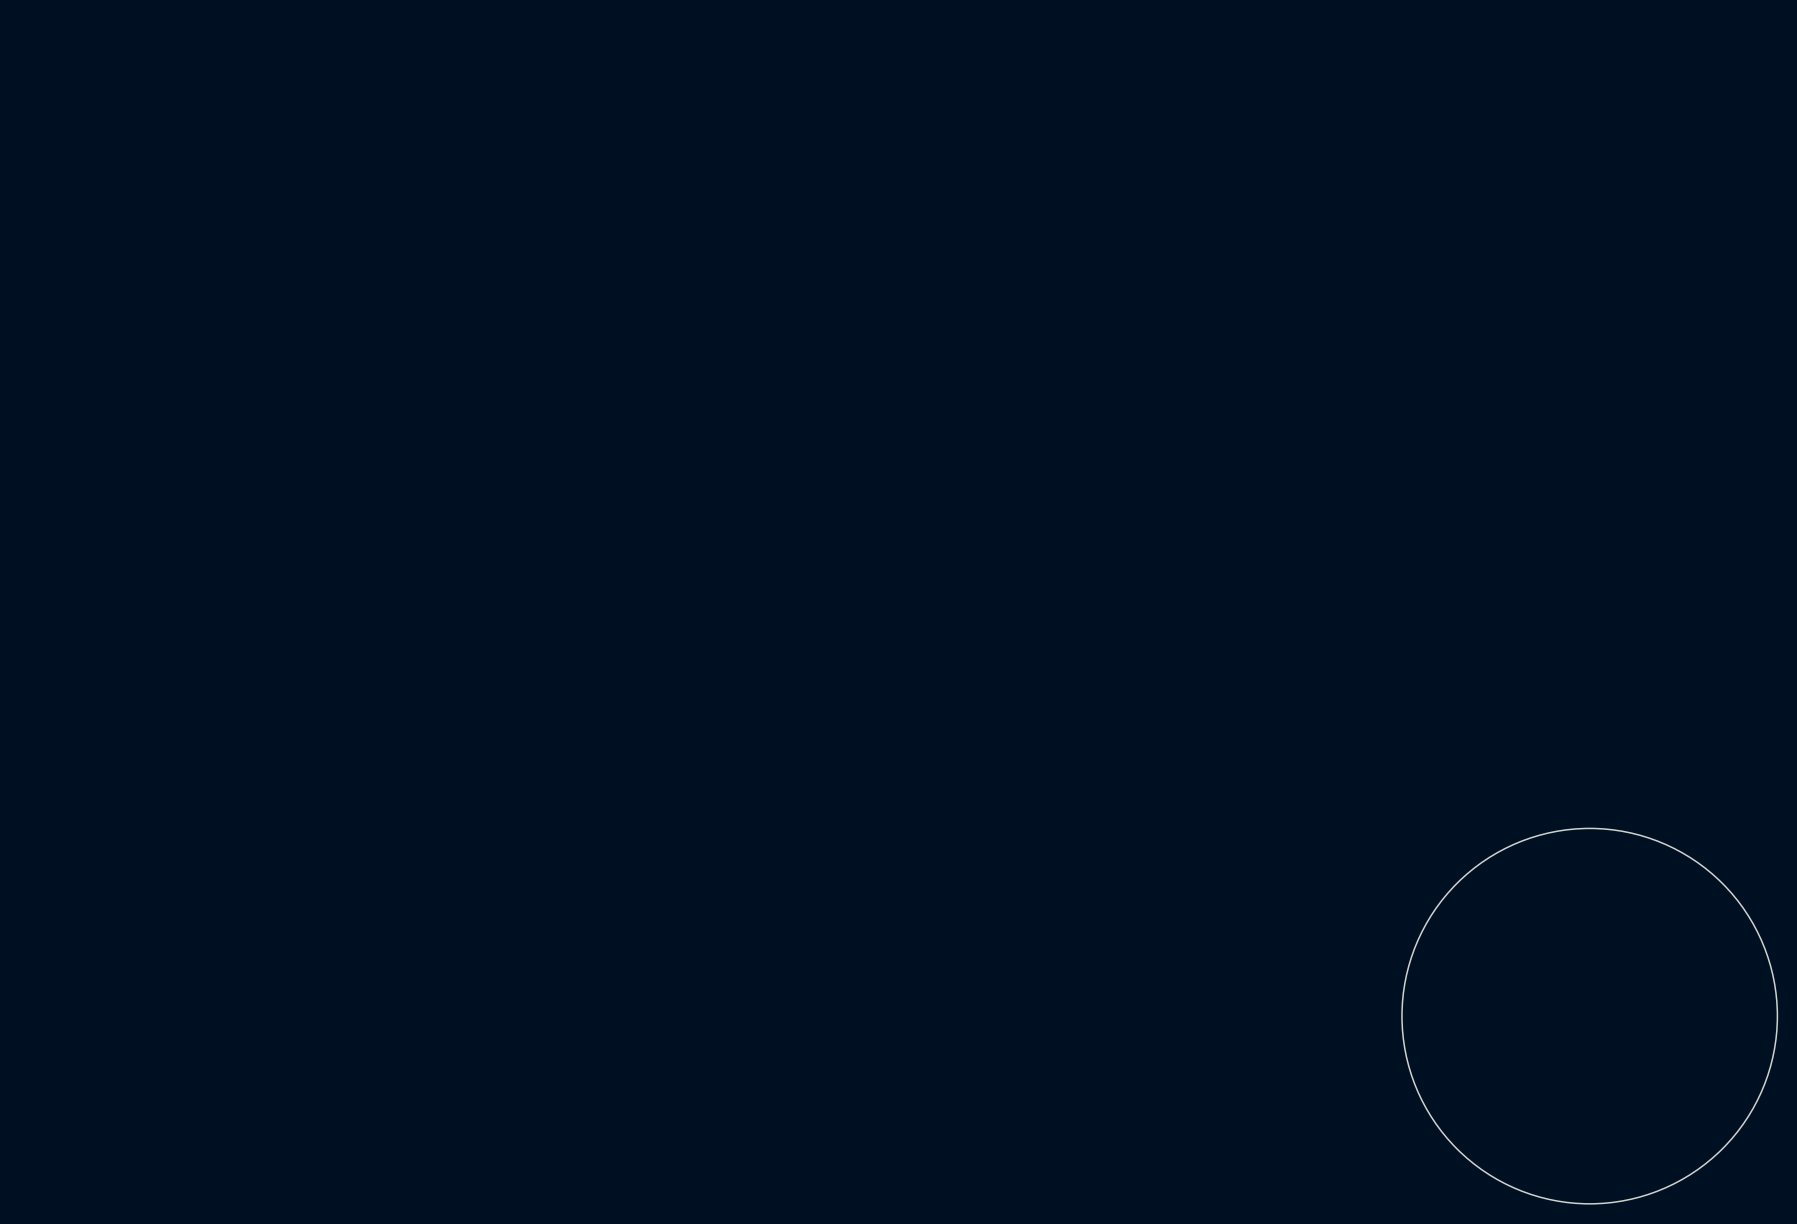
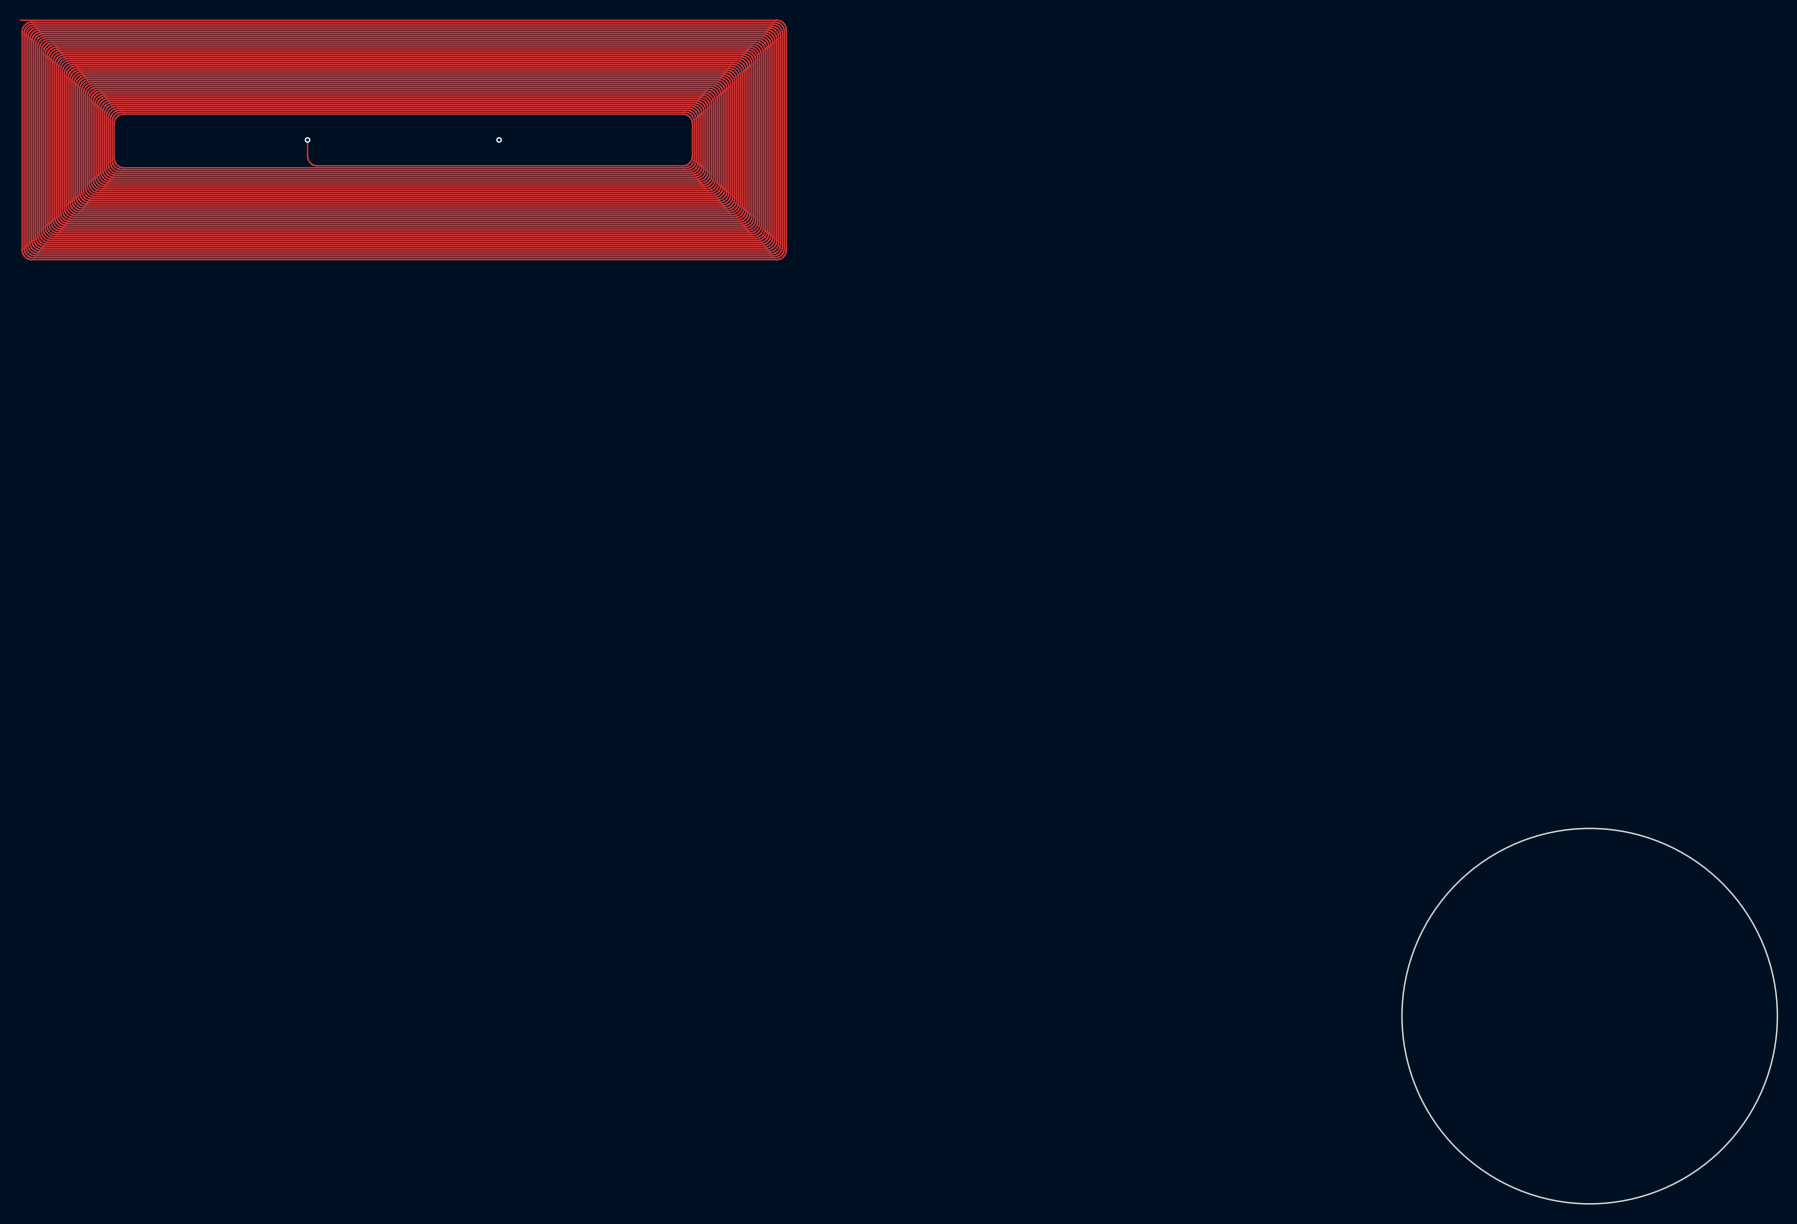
track: none -> (20, 20) (776, 20) (782, 22) (786, 27) (786, 250) (784, 256) (778, 259) (31, 259) (23, 254) (22, 31) (24, 25) (29, 22) (774, 22) (780, 24) (784, 29) (784, 248) (782, 254) (776, 257) (33, 257) (25, 252) (24, 33) (26, 27) (31, 24) (772, 24) (778, 26) (782, 31) (782, 246) (780, 252) (775, 255) (35, 255) (26, 250) (26, 35) (28, 29) (33, 26) (770, 26) (776, 28) (780, 33) (780, 244) (778, 250) (773, 253) (37, 253) (28, 248) (27, 37) (30, 31) (35, 28) (769, 27) (775, 30) (778, 35) (778, 242) (776, 248) (771, 251) (39, 252) (30, 246) (29, 39) (31, 33) (37, 30) (767, 29) (773, 31) (776, 37) (776, 240) (774, 246) (769, 249) (41, 250) (32, 244) (31, 41) (33, 35) (39, 32) (765, 31) (771, 33) (774, 39) (774, 238) (772, 244) (767, 247) (43, 248) (34, 242) (33, 43) (37, 35) (43, 33) (765, 33) (770, 37) (772, 43) (772, 238) (769, 244) (763, 246) (45, 246) (36, 240) (35, 45) (37, 39) (43, 35) (761, 35) (767, 37) (770, 43) (770, 234) (768, 240) (763, 244) (47, 244) (38, 238) (37, 47) (39, 41) (47, 37) (761, 37) (766, 41) (769, 47) (768, 234) (765, 240) (759, 242) (48, 242) (40, 237) (39, 48) (41, 43) (46, 39) (757, 39) (763, 41) (766, 46) (767, 230) (765, 236) (759, 240) (50, 240) (42, 235) (41, 50) (43, 44) (48, 41) (755, 41) (761, 43) (765, 48) (765, 229) (763, 234) (757, 238) (52, 238) (46, 236) (43, 231) (43, 52) (45, 46) (52, 43) (755, 43) (761, 46) (763, 52) (763, 229) (759, 234) (753, 236) (54, 236) (48, 234) (45, 229) (45, 54) (47, 48) (54, 45) (753, 45) (759, 48) (761, 54) (761, 227) (757, 232) (751, 234) (56, 234) (50, 232) (47, 227) (47, 56) (49, 50) (56, 47) (752, 47) (757, 50) (759, 56) (759, 225) (755, 230) (749, 232) (58, 232) (52, 230) (49, 225) (48, 58) (51, 52) (58, 48) (750, 49) (755, 52) (757, 58) (757, 223) (753, 228) (748, 230) (60, 230) (54, 228) (51, 223) (50, 60) (53, 54) (60, 50) (748, 51) (753, 54) (755, 60) (755, 221) (752, 226) (746, 229) (62, 229) (56, 226) (53, 221) (52, 62) (54, 56) (60, 53) (744, 52) (750, 54) (753, 60) (753, 217) (751, 223) (746, 226) (64, 227) (58, 225) (54, 219) (54, 64) (56, 58) (64, 54) (744, 54) (749, 58) (751, 64) (751, 217) (748, 223) (742, 225) (66, 225) (60, 223) (56, 217) (56, 66) (58, 60) (66, 56) (742, 56) (747, 60) (749, 66) (749, 215) (746, 221) (740, 223) (68, 223) (62, 221) (58, 215) (58, 68) (60, 62) (66, 58) (738, 58) (744, 60) (747, 66) (748, 211) (745, 217) (740, 221) (70, 221) (64, 219) (60, 213) (60, 70) (62, 64) (70, 60) (738, 60) (744, 64) (746, 70) (745, 211) (742, 217) (736, 219) (71, 219) (66, 217) (62, 211) (62, 71) (64, 66) (71, 62) (736, 62) (742, 66) (744, 71) (743, 210) (740, 215) (734, 217) (73, 217) (67, 215) (64, 210) (64, 73) (66, 67) (71, 64) (732, 64) (738, 66) (742, 71) (742, 206) (740, 212) (734, 215) (75, 215) (69, 213) (66, 208) (66, 75) (68, 69) (75, 66) (732, 66) (738, 69) (740, 75) (740, 206) (736, 211) (730, 213) (77, 213) (71, 211) (68, 206) (68, 77) (70, 71) (77, 68) (730, 68) (736, 71) (738, 77) (738, 204) (734, 209) (728, 211) (79, 211) (73, 209) (70, 204) (70, 79) (72, 73) (79, 70) (729, 70) (734, 73) (736, 79) (736, 202) (732, 207) (726, 209) (81, 209) (75, 207) (72, 202) (71, 81) (74, 75) (81, 71) (727, 72) (732, 75) (734, 81) (734, 200) (731, 205) (725, 207) (83, 207) (77, 205) (74, 200) (73, 83) (75, 77) (83, 73) (725, 74) (730, 77) (732, 83) (732, 198) (729, 203) (723, 206) (85, 206) (79, 203) (76, 198) (75, 85) (77, 79) (83, 76) (721, 75) (727, 77) (730, 83) (730, 194) (728, 200) (723, 203) (87, 204) (81, 202) (77, 196) (77, 87) (79, 81) (87, 77) (721, 77) (726, 81) (728, 87) (728, 194) (725, 200) (719, 202) (89, 202) (83, 200) (79, 194) (79, 89) (81, 83) (87, 79) (717, 79) (723, 81) (726, 87) (726, 190) (724, 196) (719, 200) (91, 200) (85, 198) (81, 192) (81, 91) (83, 85) (91, 81) (717, 81) (722, 85) (725, 91) (724, 190) (721, 196) (715, 198) (93, 198) (87, 196) (83, 190) (83, 93) (85, 87) (93, 83) (715, 83) (721, 87) (723, 93) (722, 189) (719, 194) (713, 196) (94, 196) (88, 194) (85, 189) (85, 94) (87, 88) (92, 85) (711, 85) (719, 88) (721, 94) (721, 184) (719, 190) (713, 194) (96, 194) (90, 192) (87, 187) (87, 96) (89, 90) (94, 87) (709, 87) (717, 90) (719, 96) (719, 183) (717, 189) (711, 192) (98, 192) (92, 190) (89, 185) (89, 98) (91, 92) (96, 89) (707, 89) (715, 92) (717, 98) (717, 181) (715, 187) (709, 190) (100, 190) (94, 188) (91, 183) (91, 100) (93, 94) (100, 91) (708, 91) (713, 94) (715, 100) (715, 179) (713, 185) (705, 188) (102, 188) (96, 186) (93, 181) (93, 102) (95, 96) (100, 93) (703, 93) (711, 96) (713, 102) (713, 177) (711, 183) (706, 186) (104, 186) (98, 184) (95, 179) (94, 104) (97, 98) (102, 95) (702, 94) (708, 97) (711, 104) (711, 175) (709, 181) (704, 184) (106, 184) (100, 182) (97, 177) (97, 104) (100, 98) (106, 96) (702, 97) (707, 100) (709, 106) (709, 173) (707, 179) (700, 183) (108, 183) (102, 180) (99, 175) (99, 106) (102, 100) (108, 98) (698, 98) (704, 100) (707, 108) (707, 173) (704, 179) (698, 181) (110, 181) (104, 179) (100, 173) (100, 108) (104, 102) (110, 100) (698, 100) (703, 104) (705, 110) (705, 169) (703, 175) (696, 179) (112, 179) (106, 177) (102, 171) (102, 110) (106, 104) (112, 102) (694, 102) (700, 104) (703, 112) (703, 169) (700, 175) (694, 177) (114, 177) (108, 175) (104, 169) (104, 111) (108, 106) (114, 104) (692, 104) (698, 106) (702, 114) (701, 167) (698, 173) (692, 175) (116, 175) (110, 173) (106, 167) (106, 113) (110, 108) (116, 106) (690, 106) (696, 108) (699, 113) (700, 163) (698, 169) (690, 173) (117, 173) (111, 171) (108, 166) (108, 115) (111, 110) (117, 108) (688, 108) (694, 110) (697, 115) (698, 161) (696, 167) (688, 171) (119, 171) (113, 169) (110, 164) (110, 117) (113, 112) (119, 110) (686, 110) (692, 112) (696, 119) (696, 162) (692, 167) (686, 169) (121, 169) (115, 167) (112, 160) (112, 119) (115, 114) (121, 112) (684, 112) (690, 114) (694, 119) (694, 158) (692, 164) (684, 167) (123, 167) (117, 165) (114, 158) (114, 121) (117, 116) (123, 114) (682, 114) (688, 116) (692, 123) (692, 158) (688, 163) (682, 165) (317, 165) (308, 160) (307, 139)
via: none -> (307, 139)
via: none -> (499, 139)

